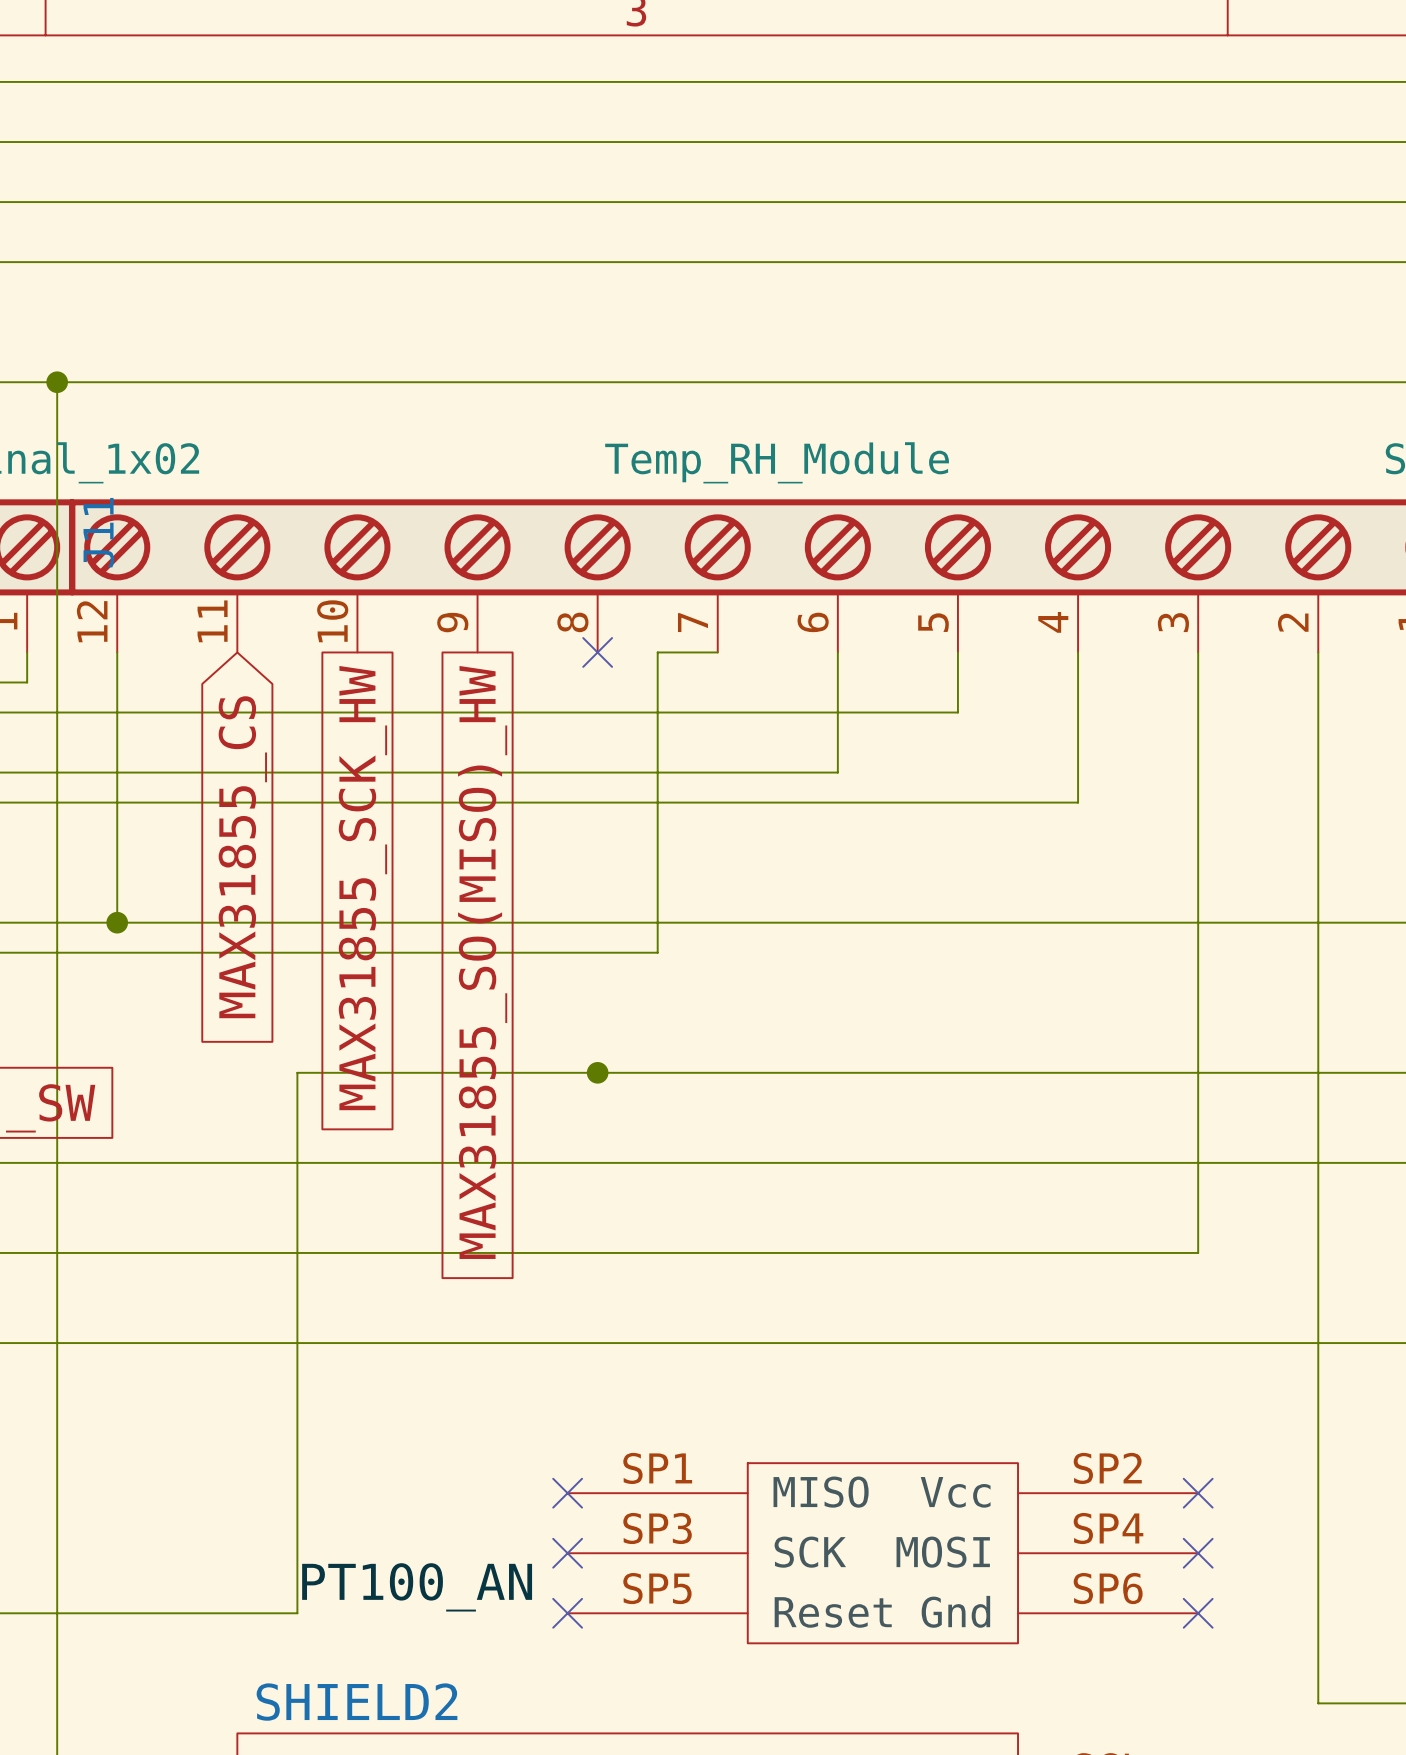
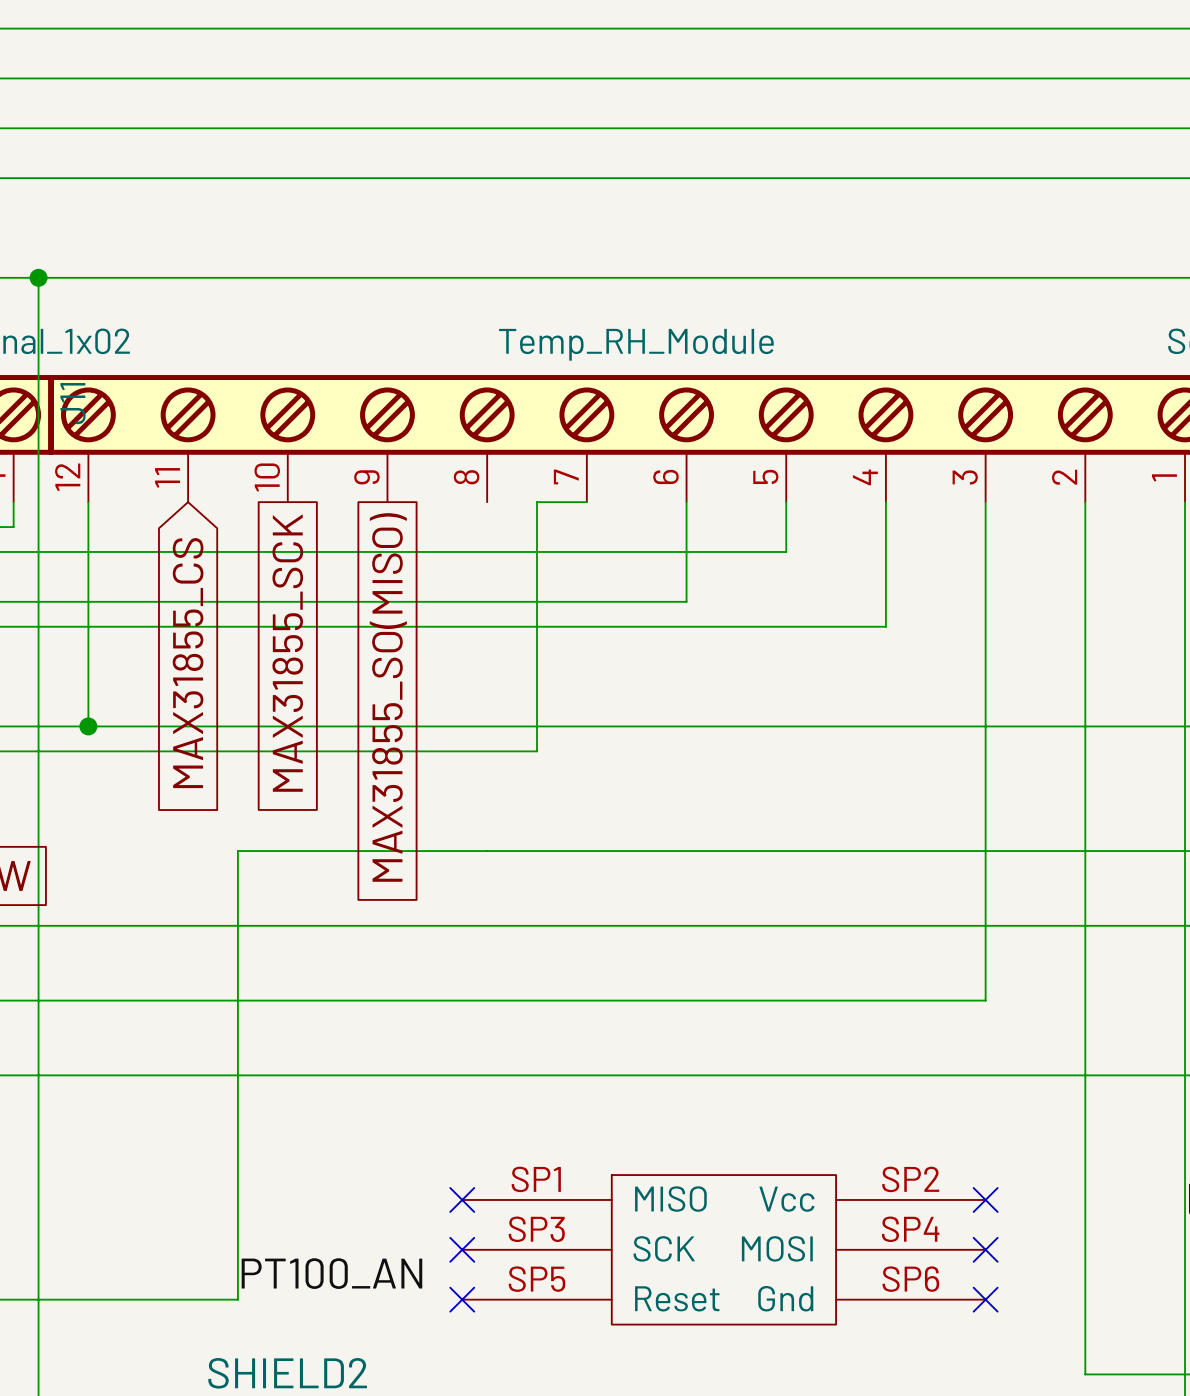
no-connect mark: (597, 652) -> none
global label: MAX31855_SCK_HW (362, 888) -> MAX31855_SCK (287, 653)
global label: MAX31855_SO(MISO)_HW (482, 962) -> MAX31855_SO(MISO) (388, 697)
junction: (597, 1072) -> none

